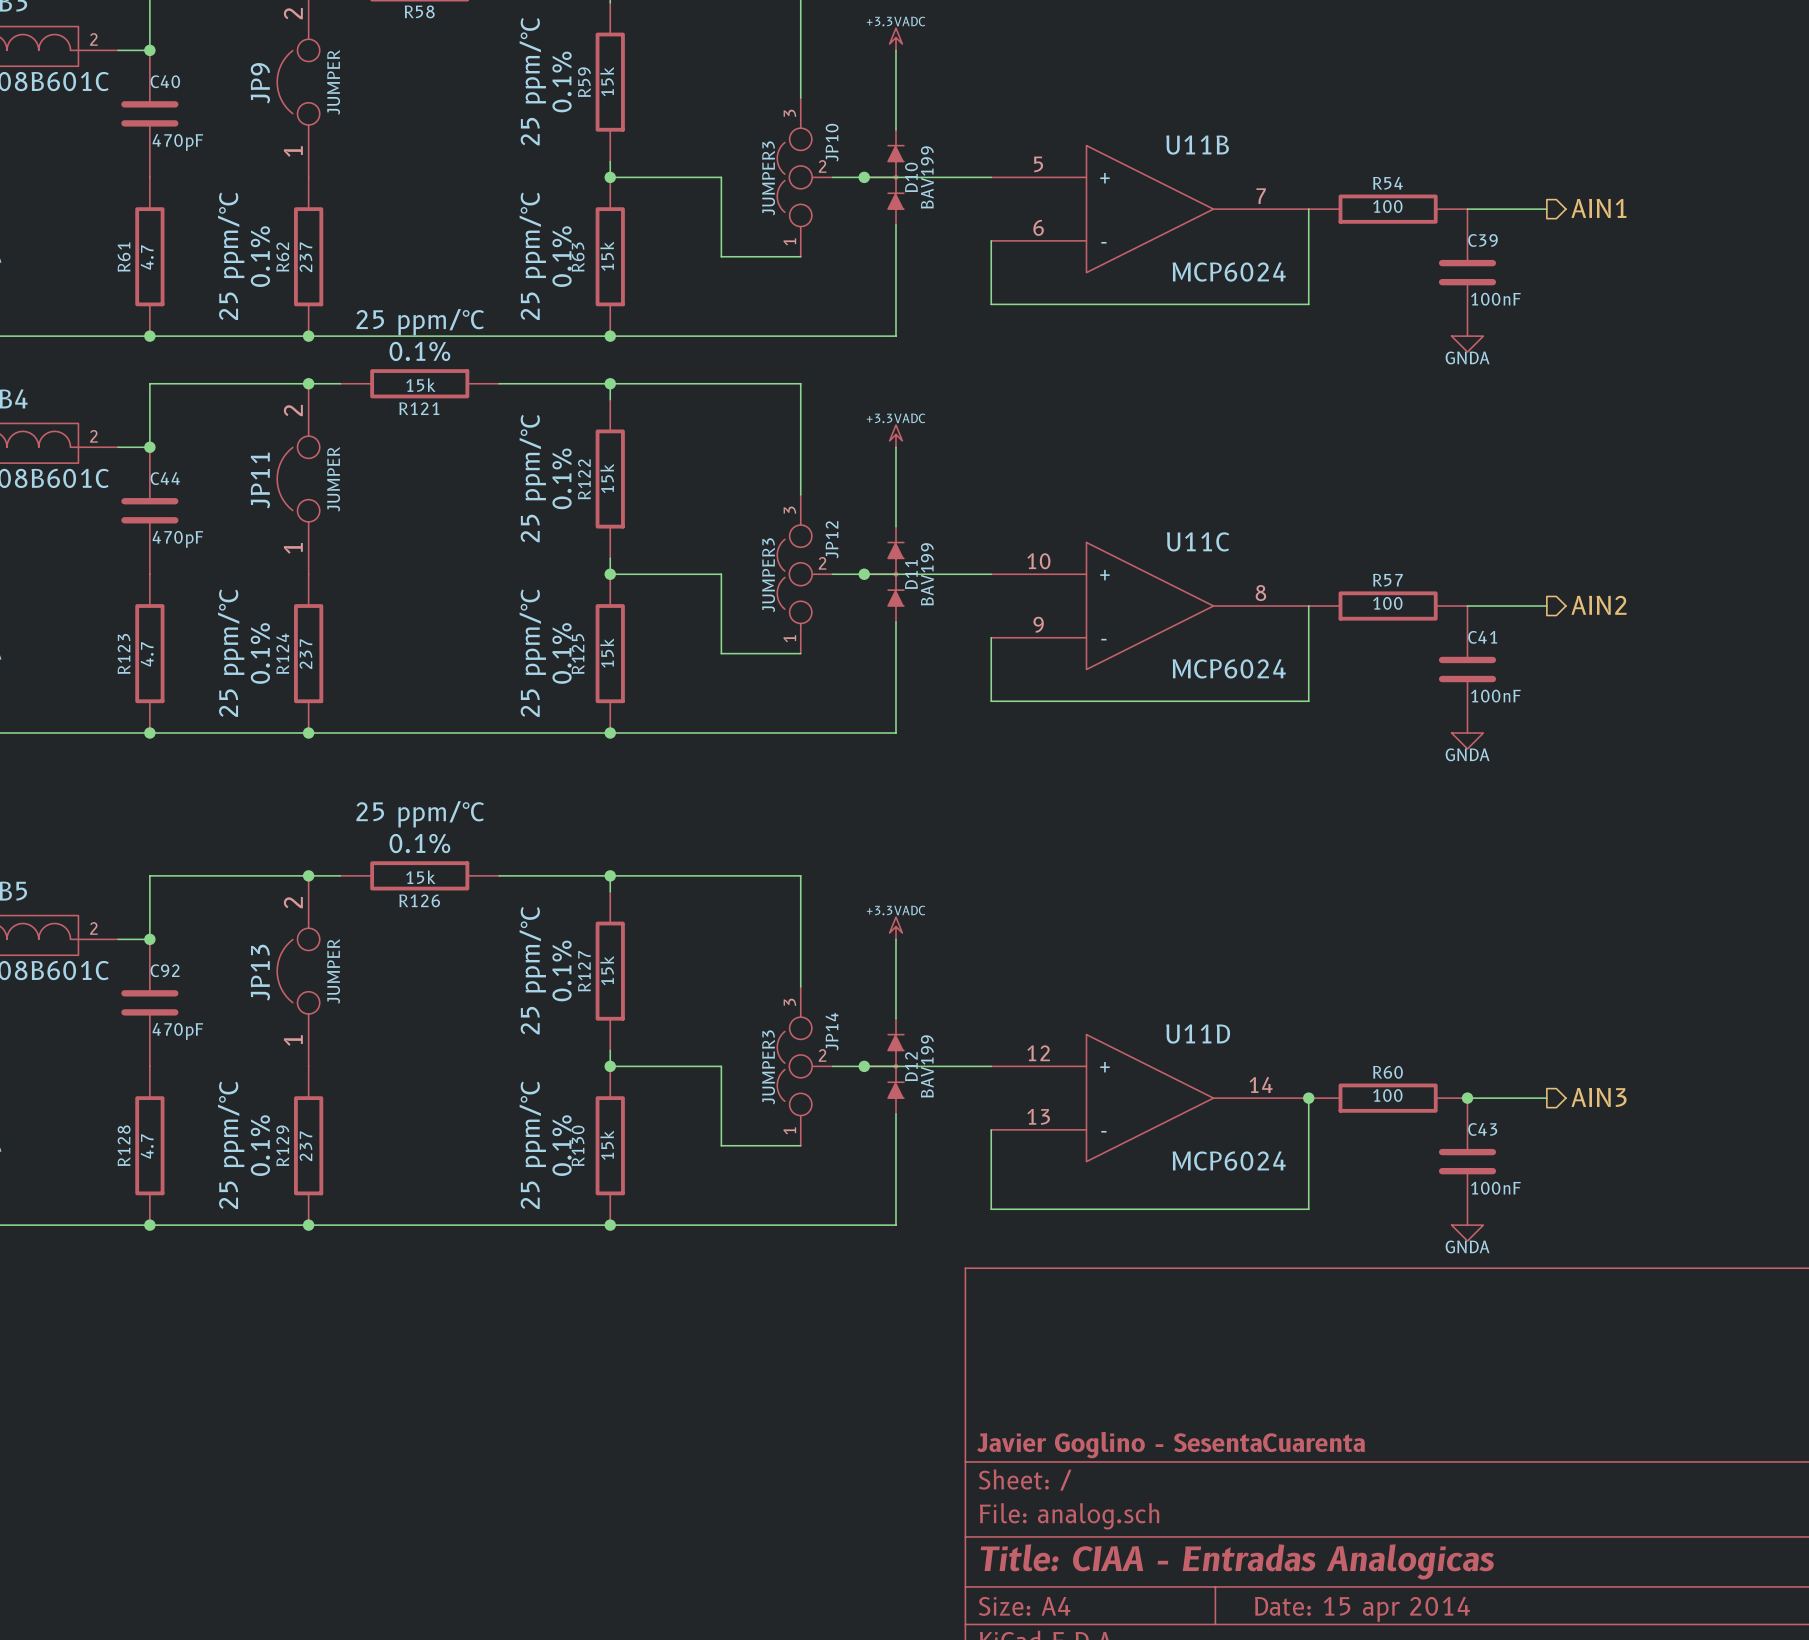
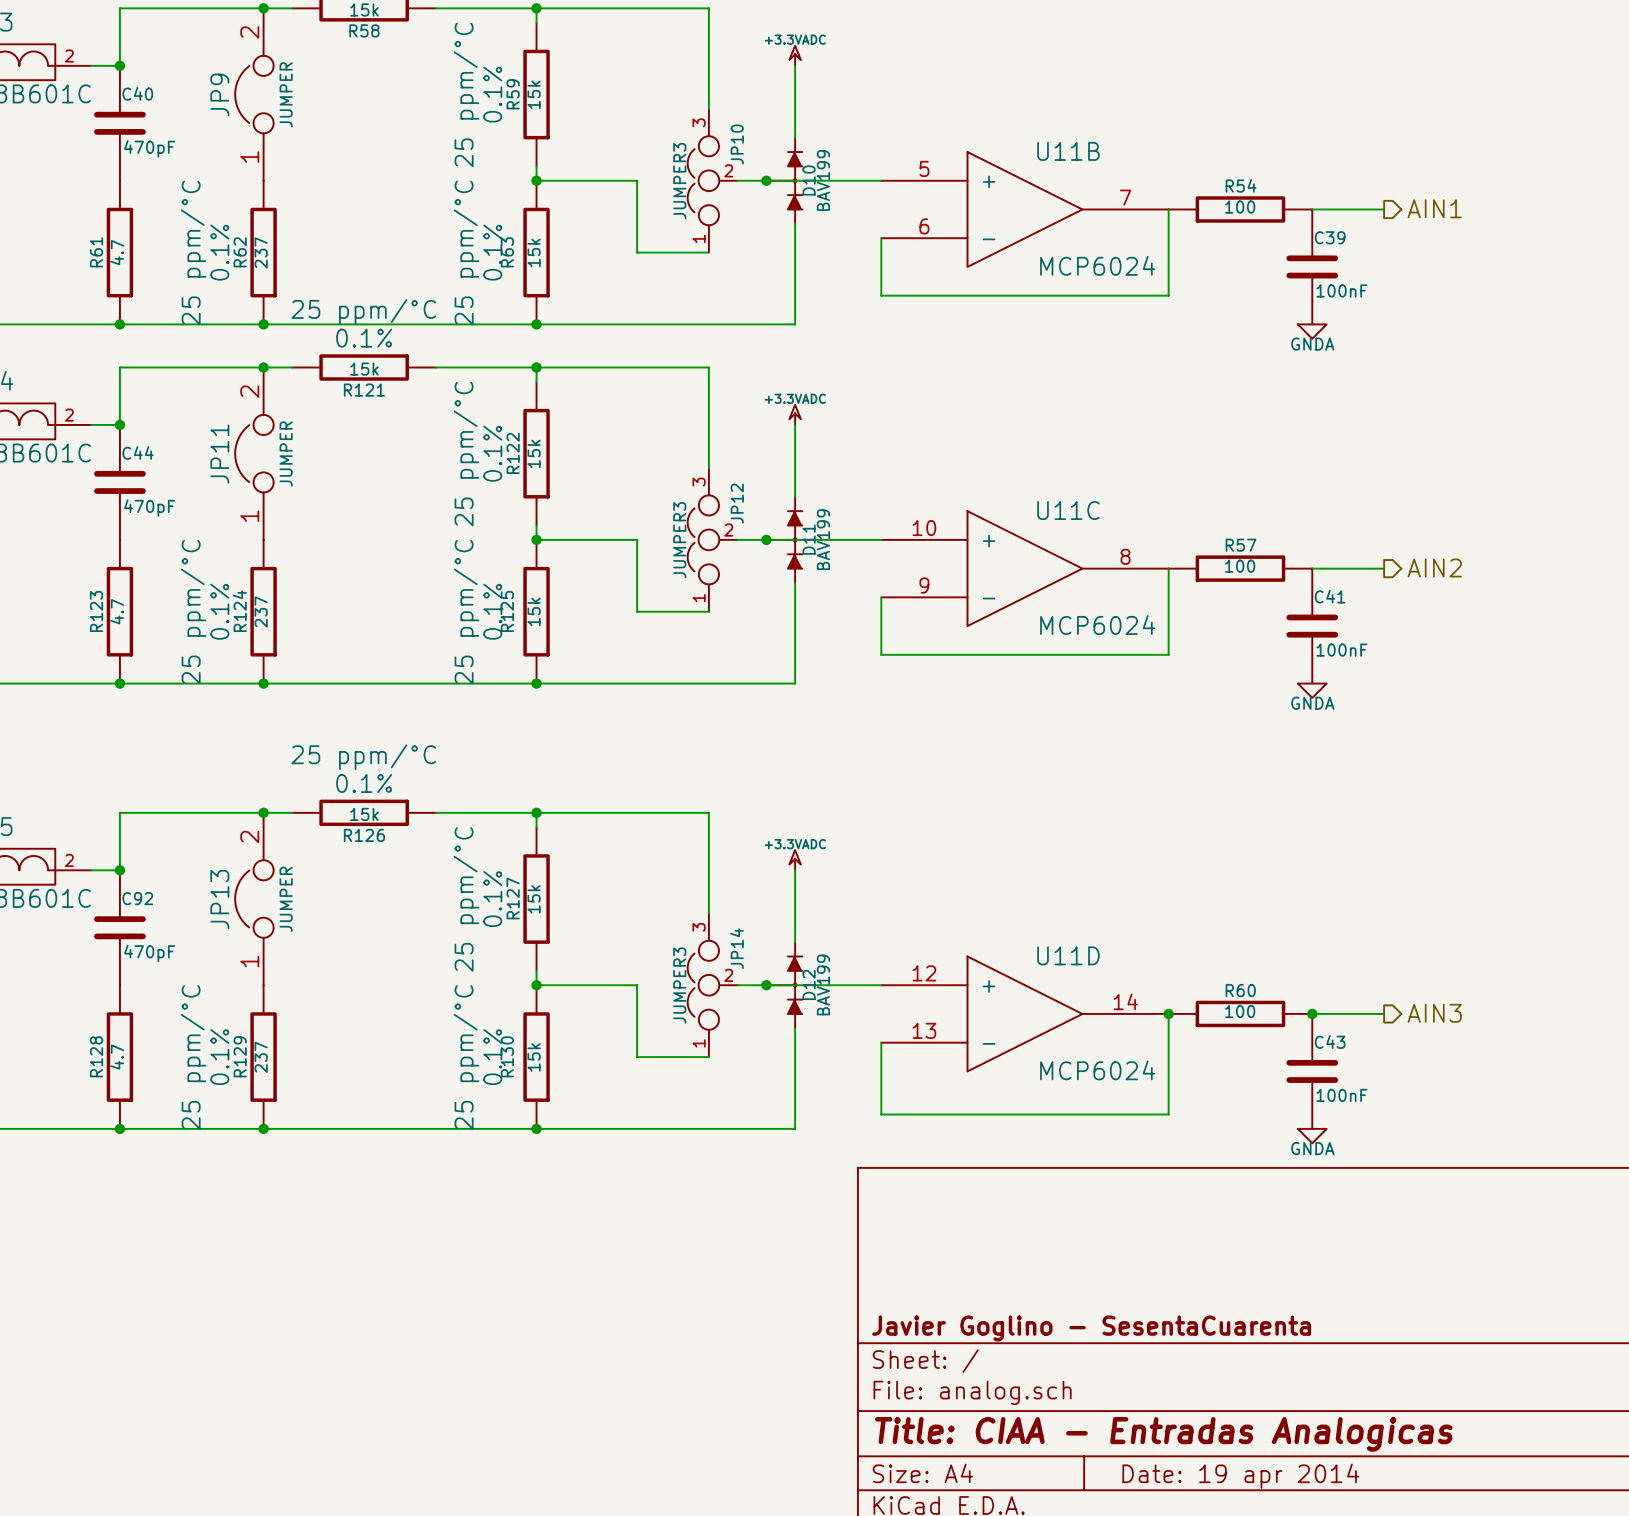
title block: Date: 15 apr 2014 (1362, 1609) -> Date: 19 apr 2014 (1240, 1476)

